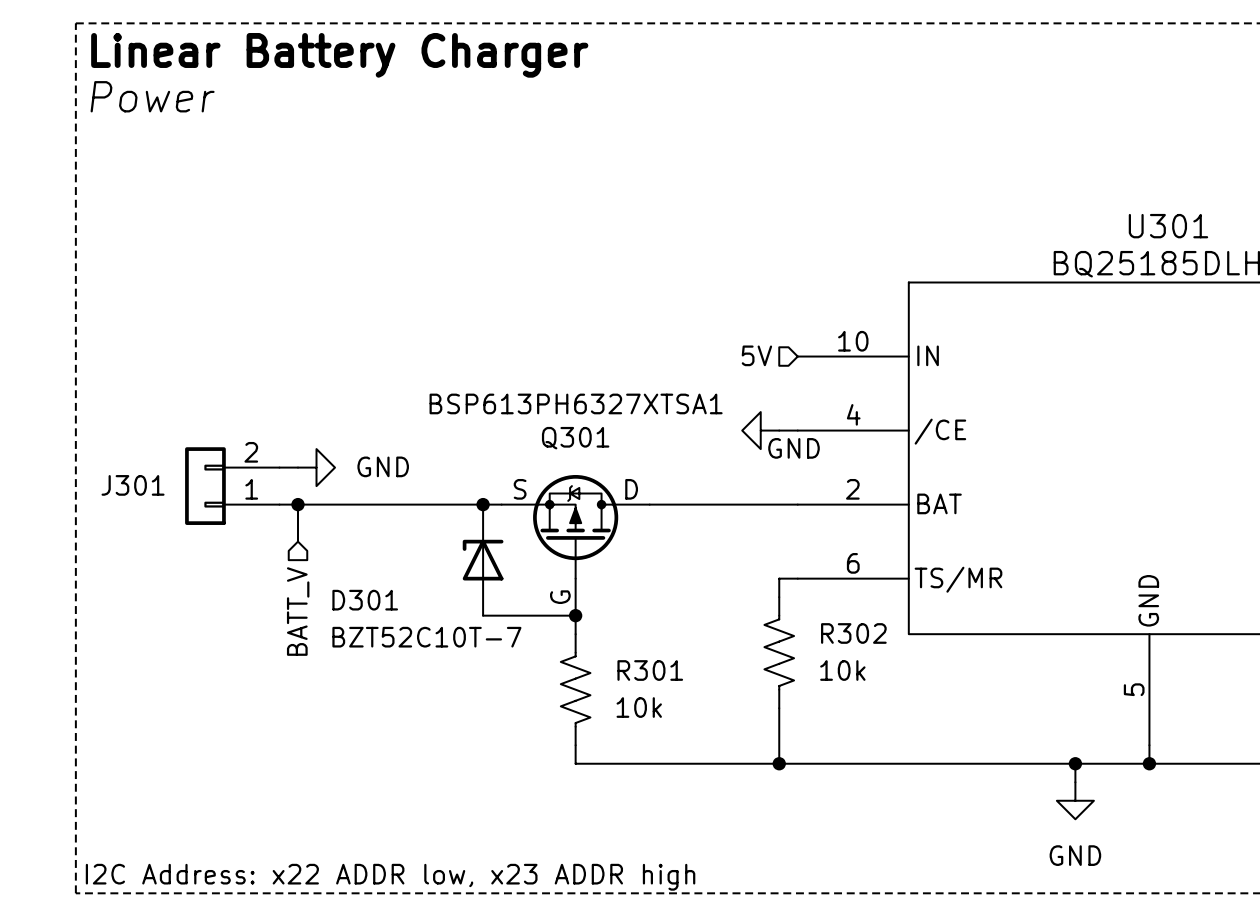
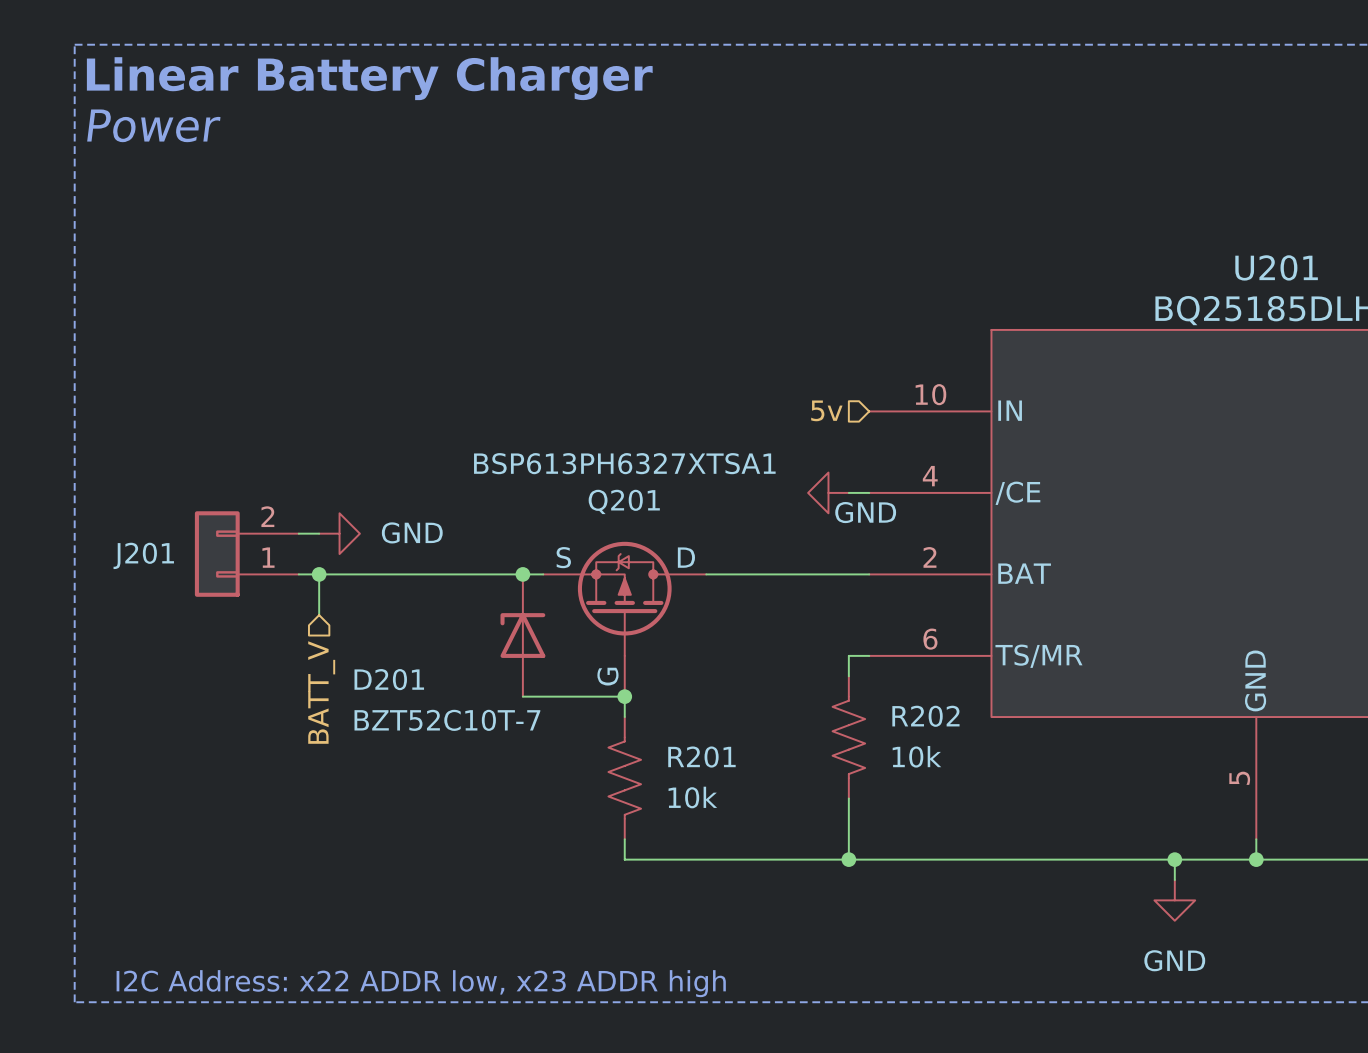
U301 name: U301 (1168, 226) -> U201 (1276, 267)
hierarchical label: 5V (756, 355) -> 5v (826, 410)
Q301 name: Q301 (575, 438) -> Q201 (624, 501)
J301 name: J301 (133, 485) -> J201 (143, 555)
D301 name: D301 (365, 600) -> D201 (389, 679)
R302 name: R302 (853, 633) -> R202 (925, 716)
R301 name: R301 (650, 670) -> R201 (701, 757)

